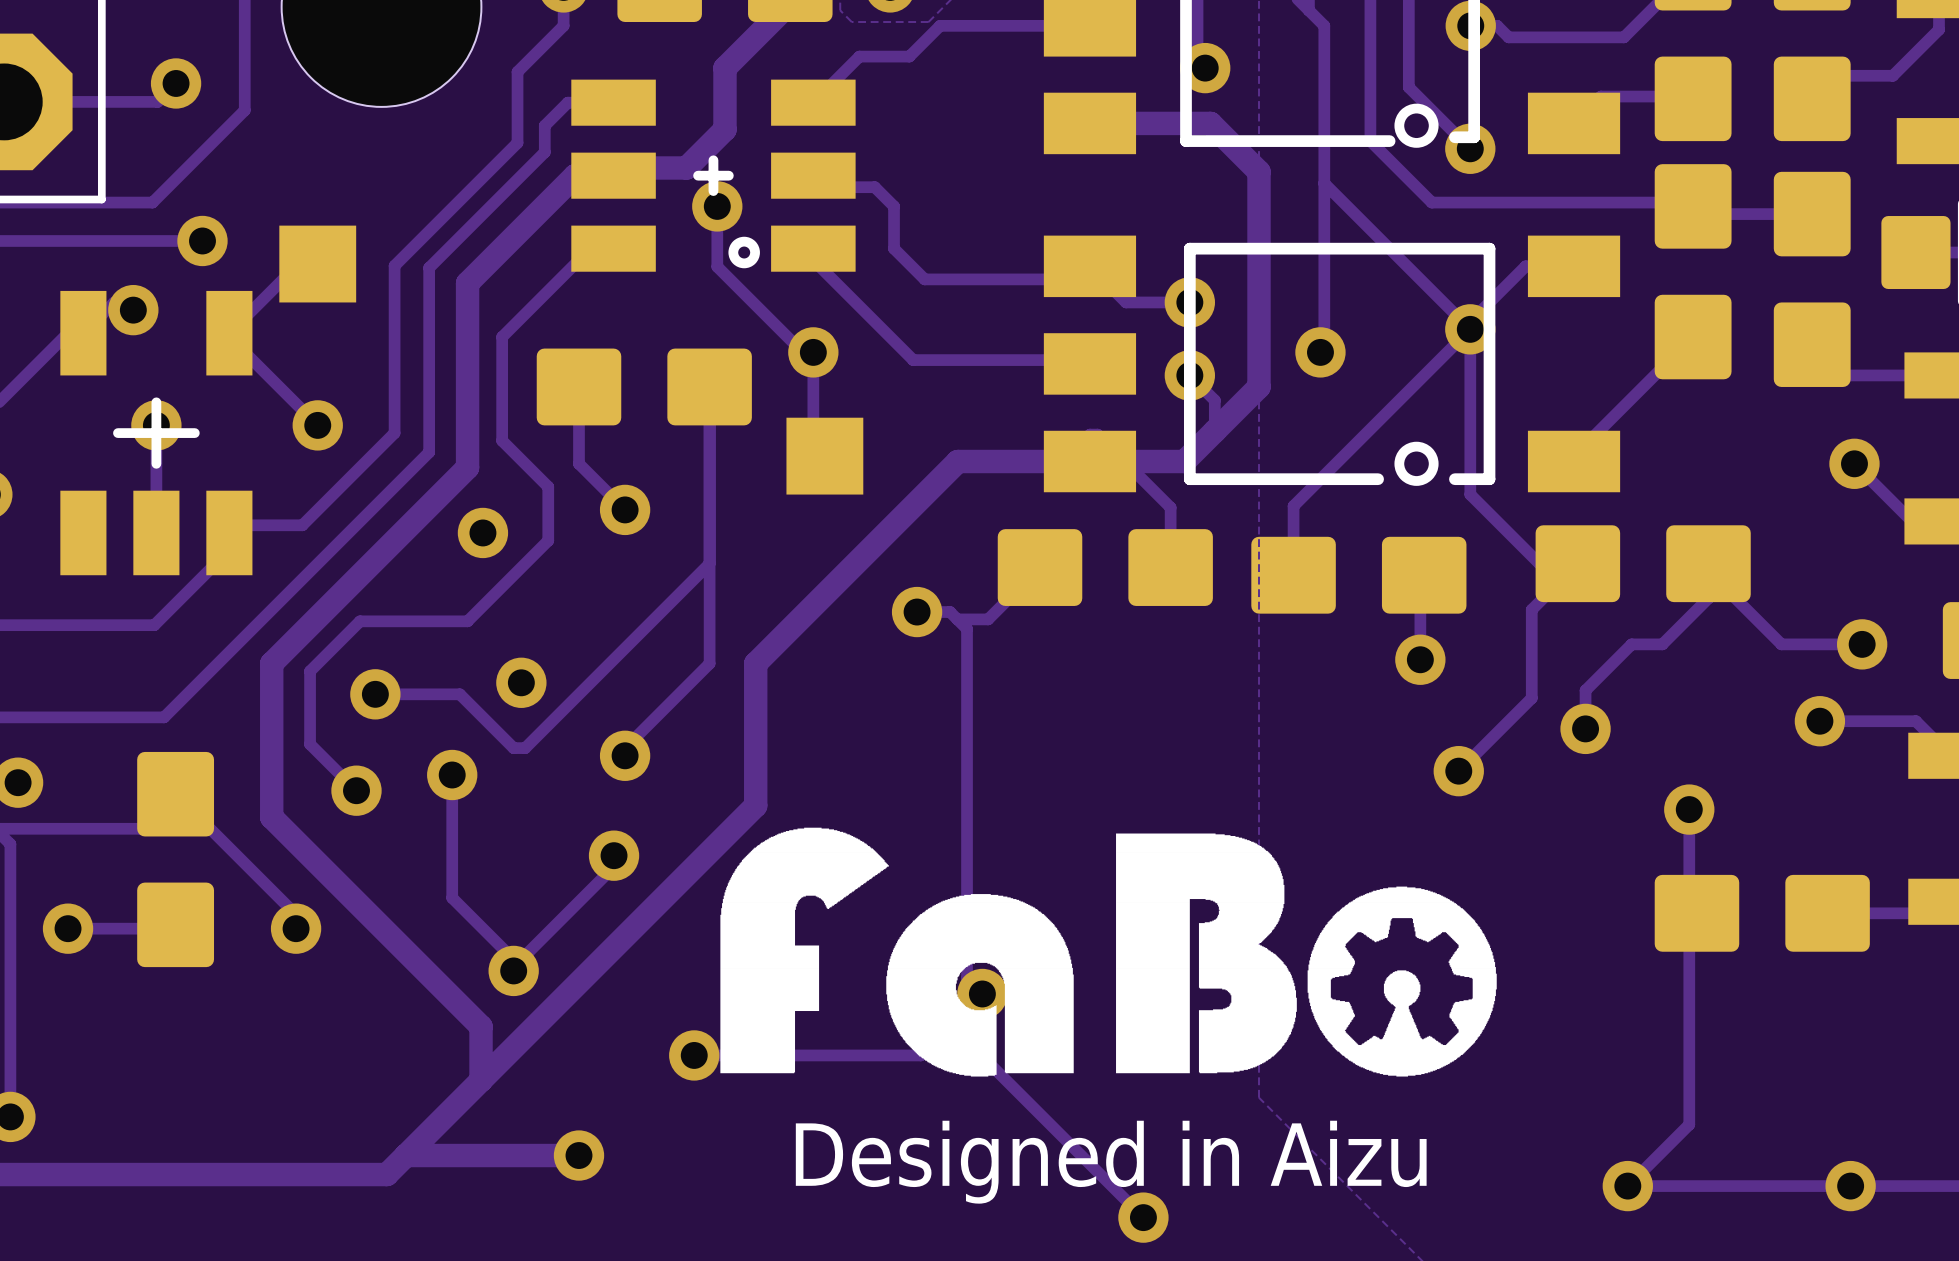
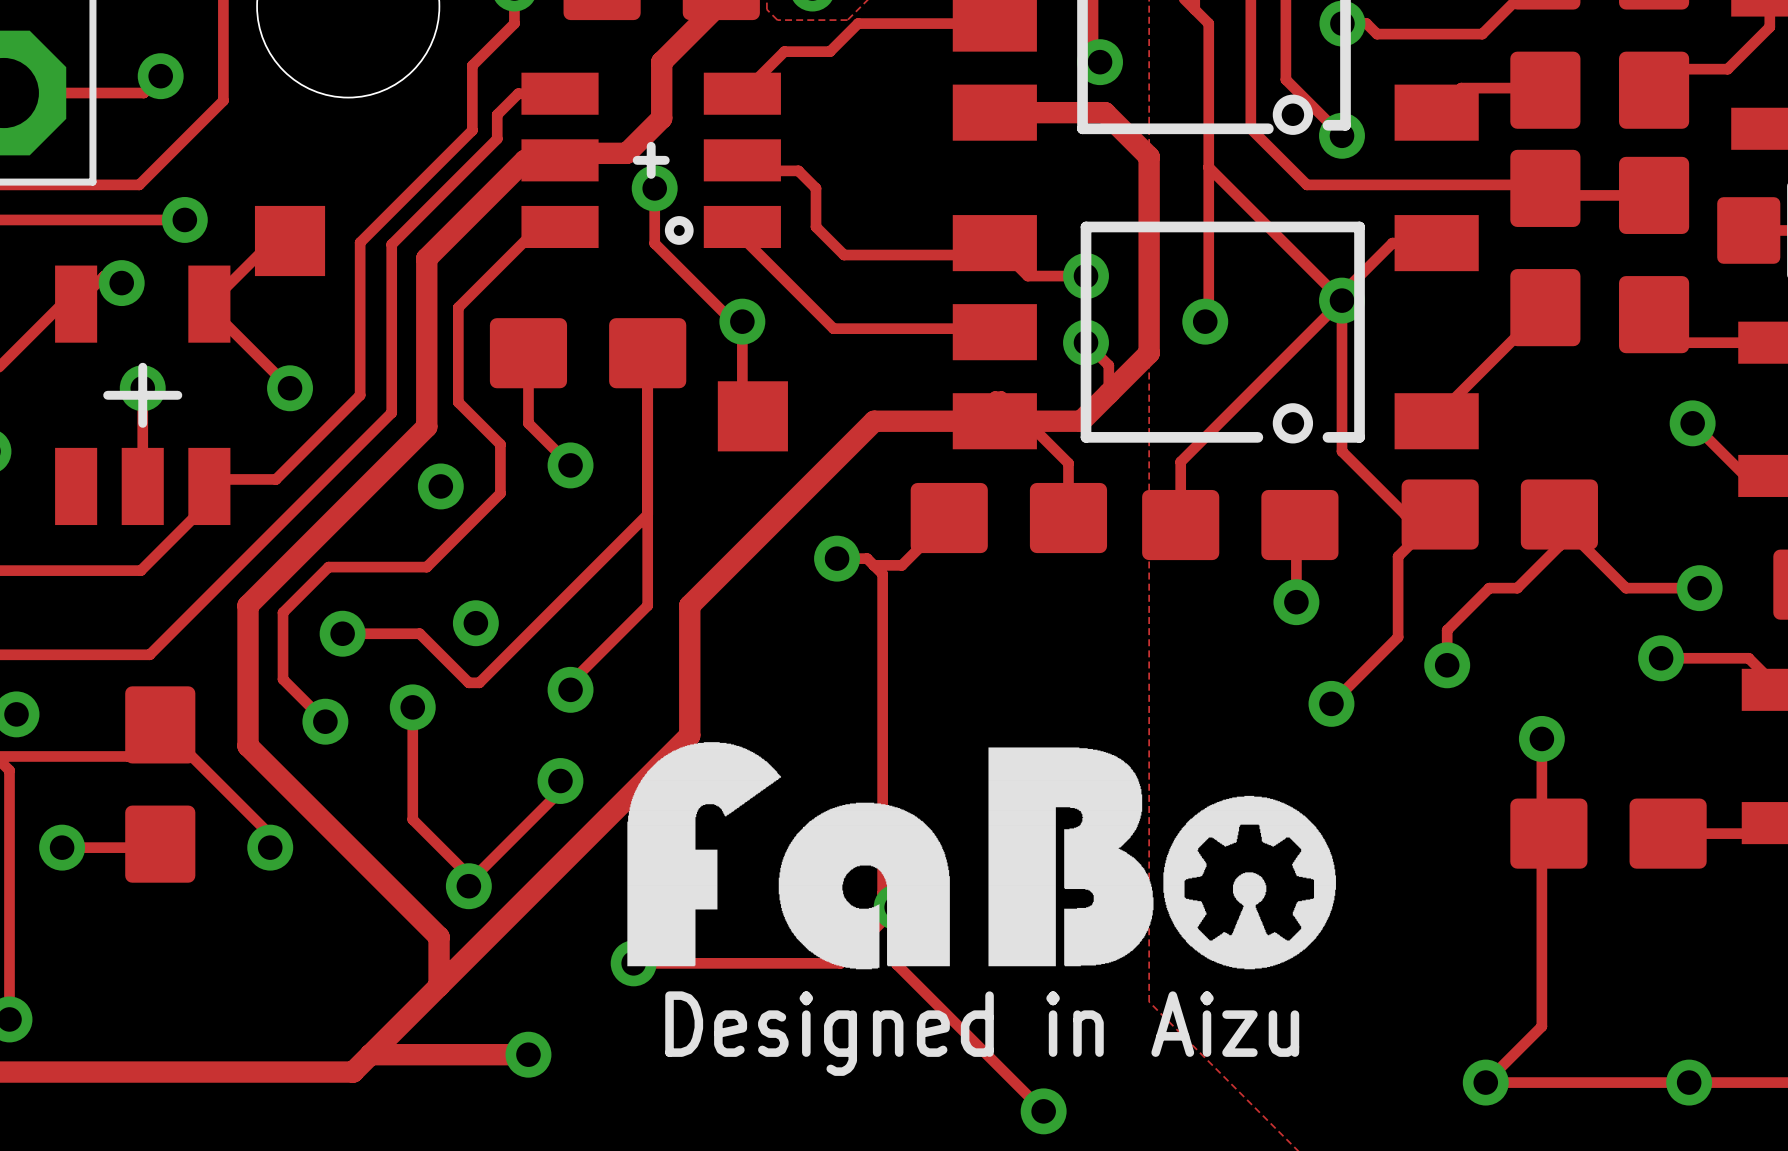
drawing position: (1108, 952) -> (981, 855)
text position: Designed in Aizu (1111, 1162) -> Designed in Aizu (982, 1033)

